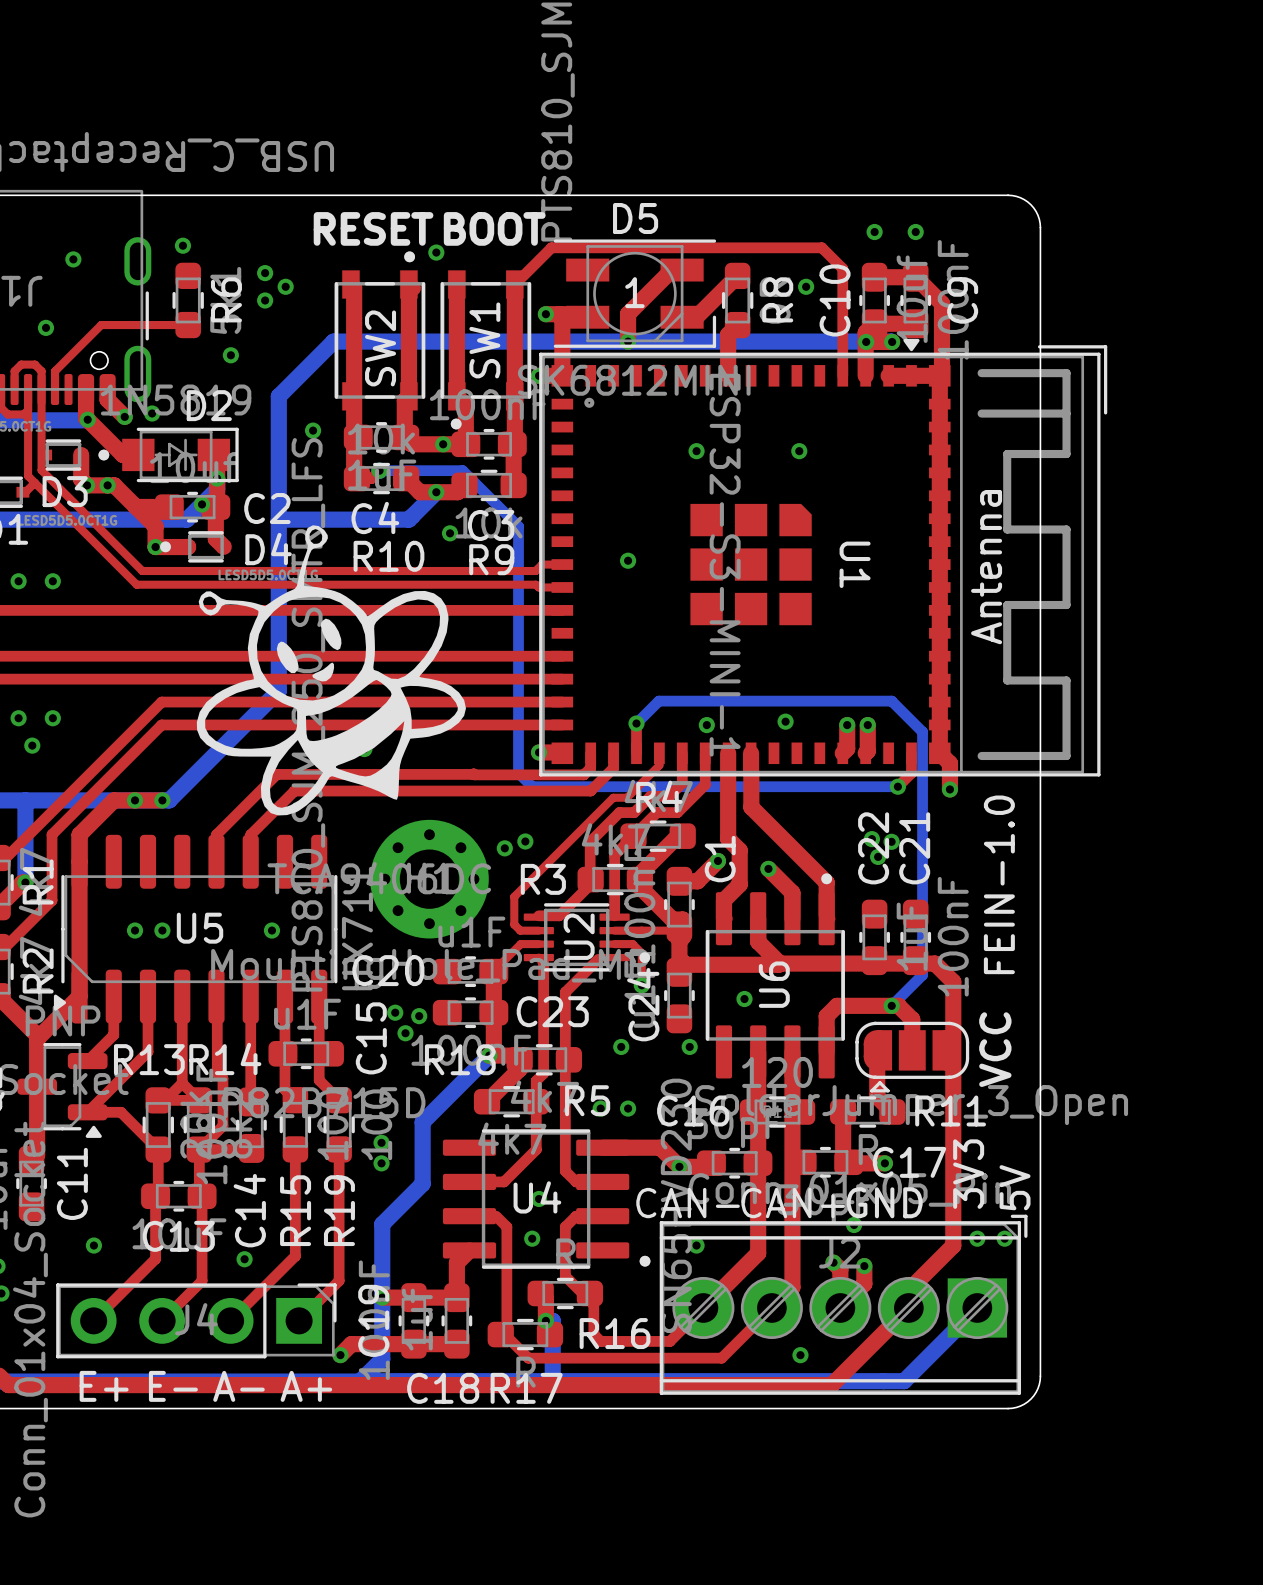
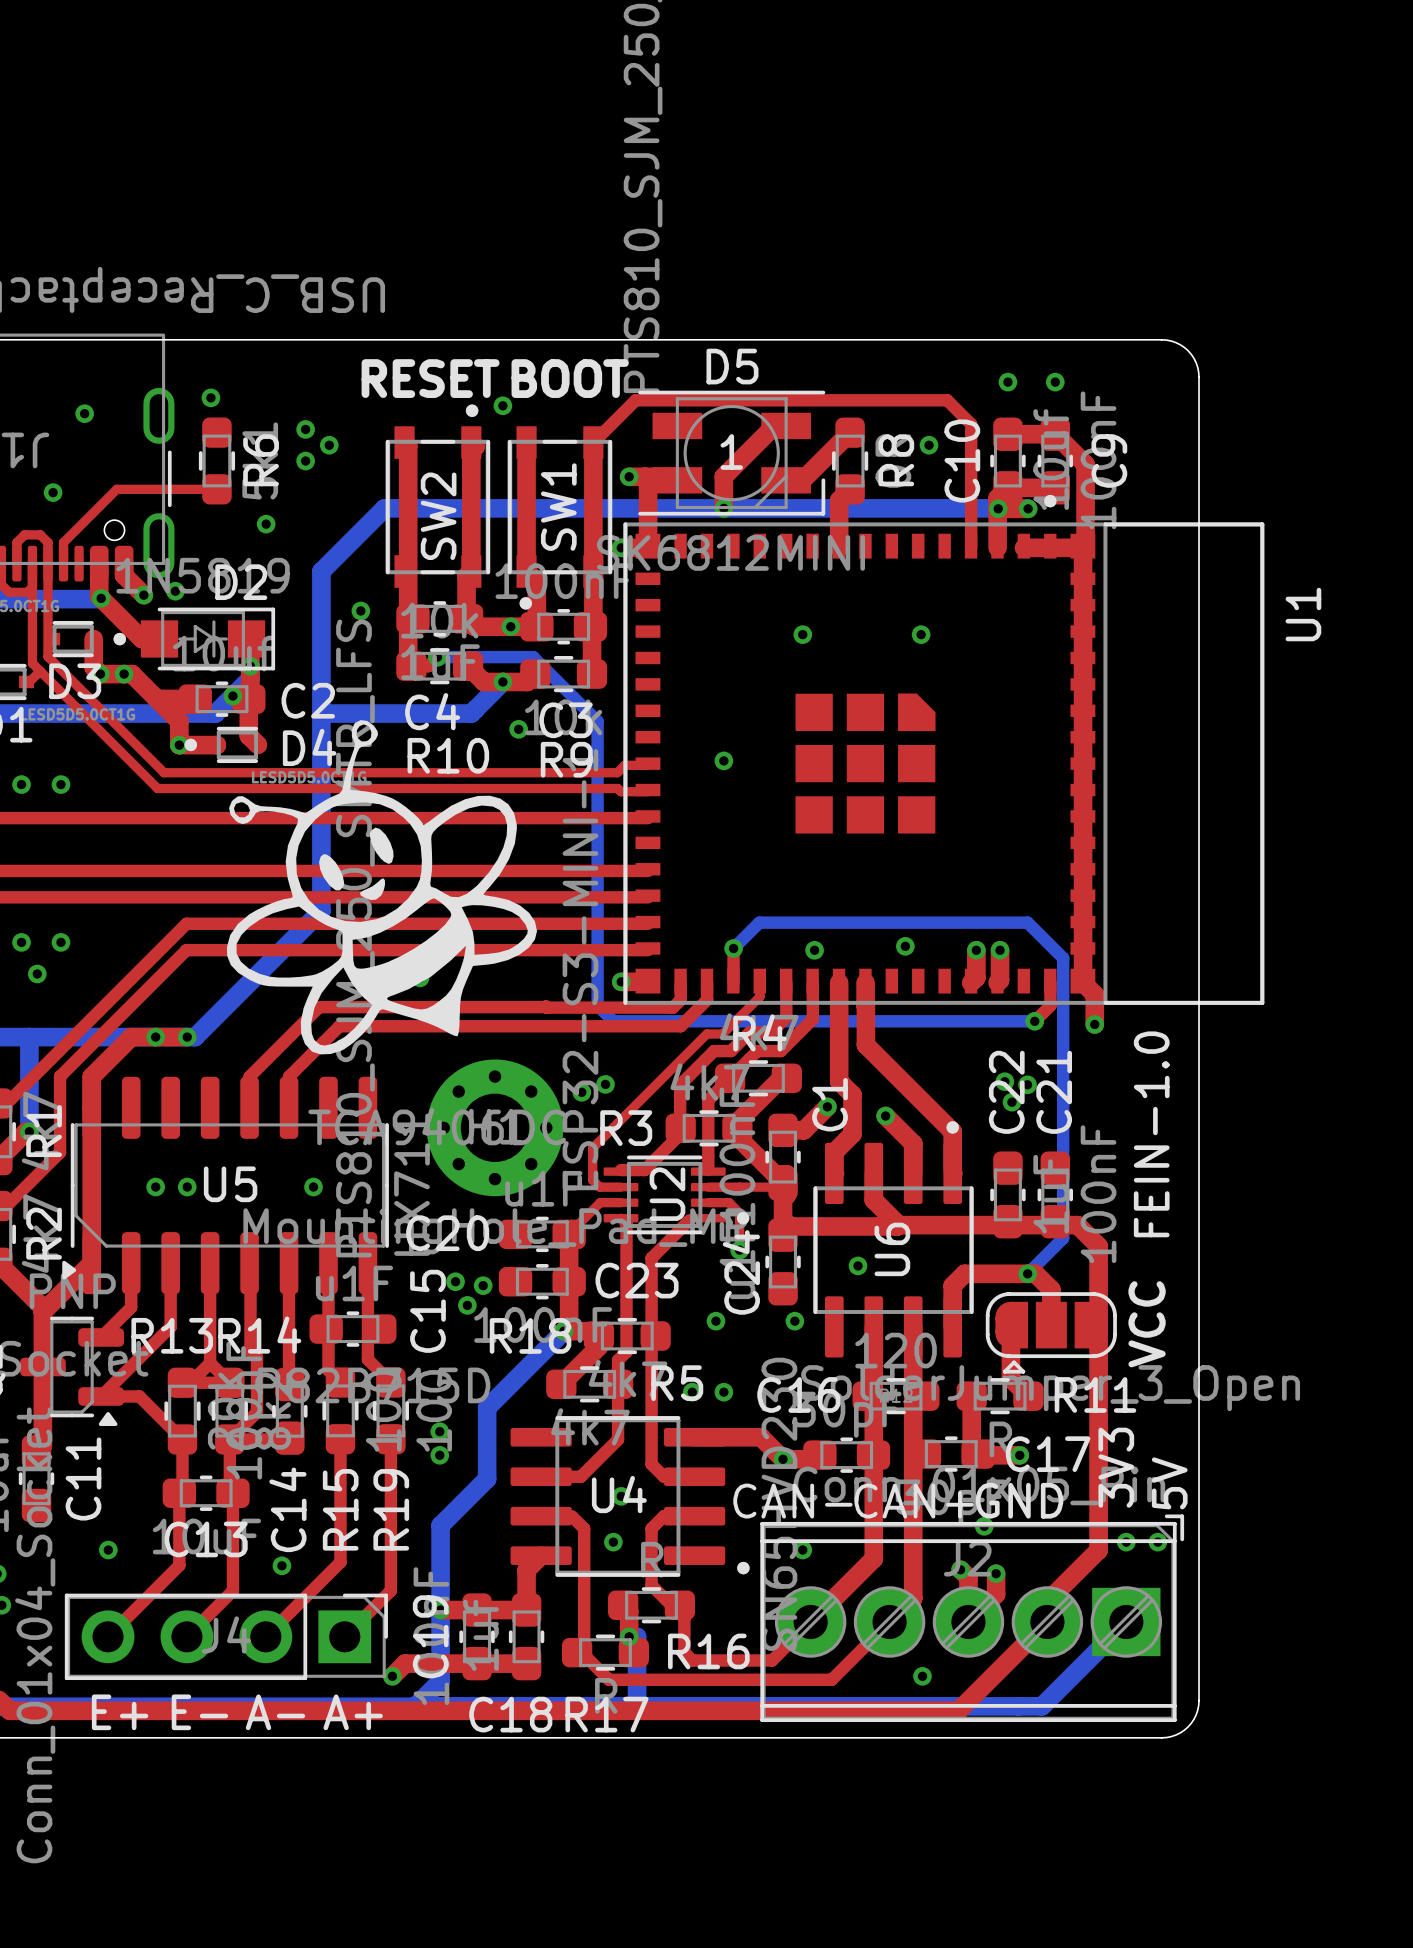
U1 footprint: [539, 338, 1108, 777] -> [623, 494, 1265, 1005]
U1 name position: U1 (855, 564) -> U1 (1303, 614)
U1 value position: ESP32-S3-MINI-1 (725, 565) -> ESP32-S3-MINI-1 (580, 969)

